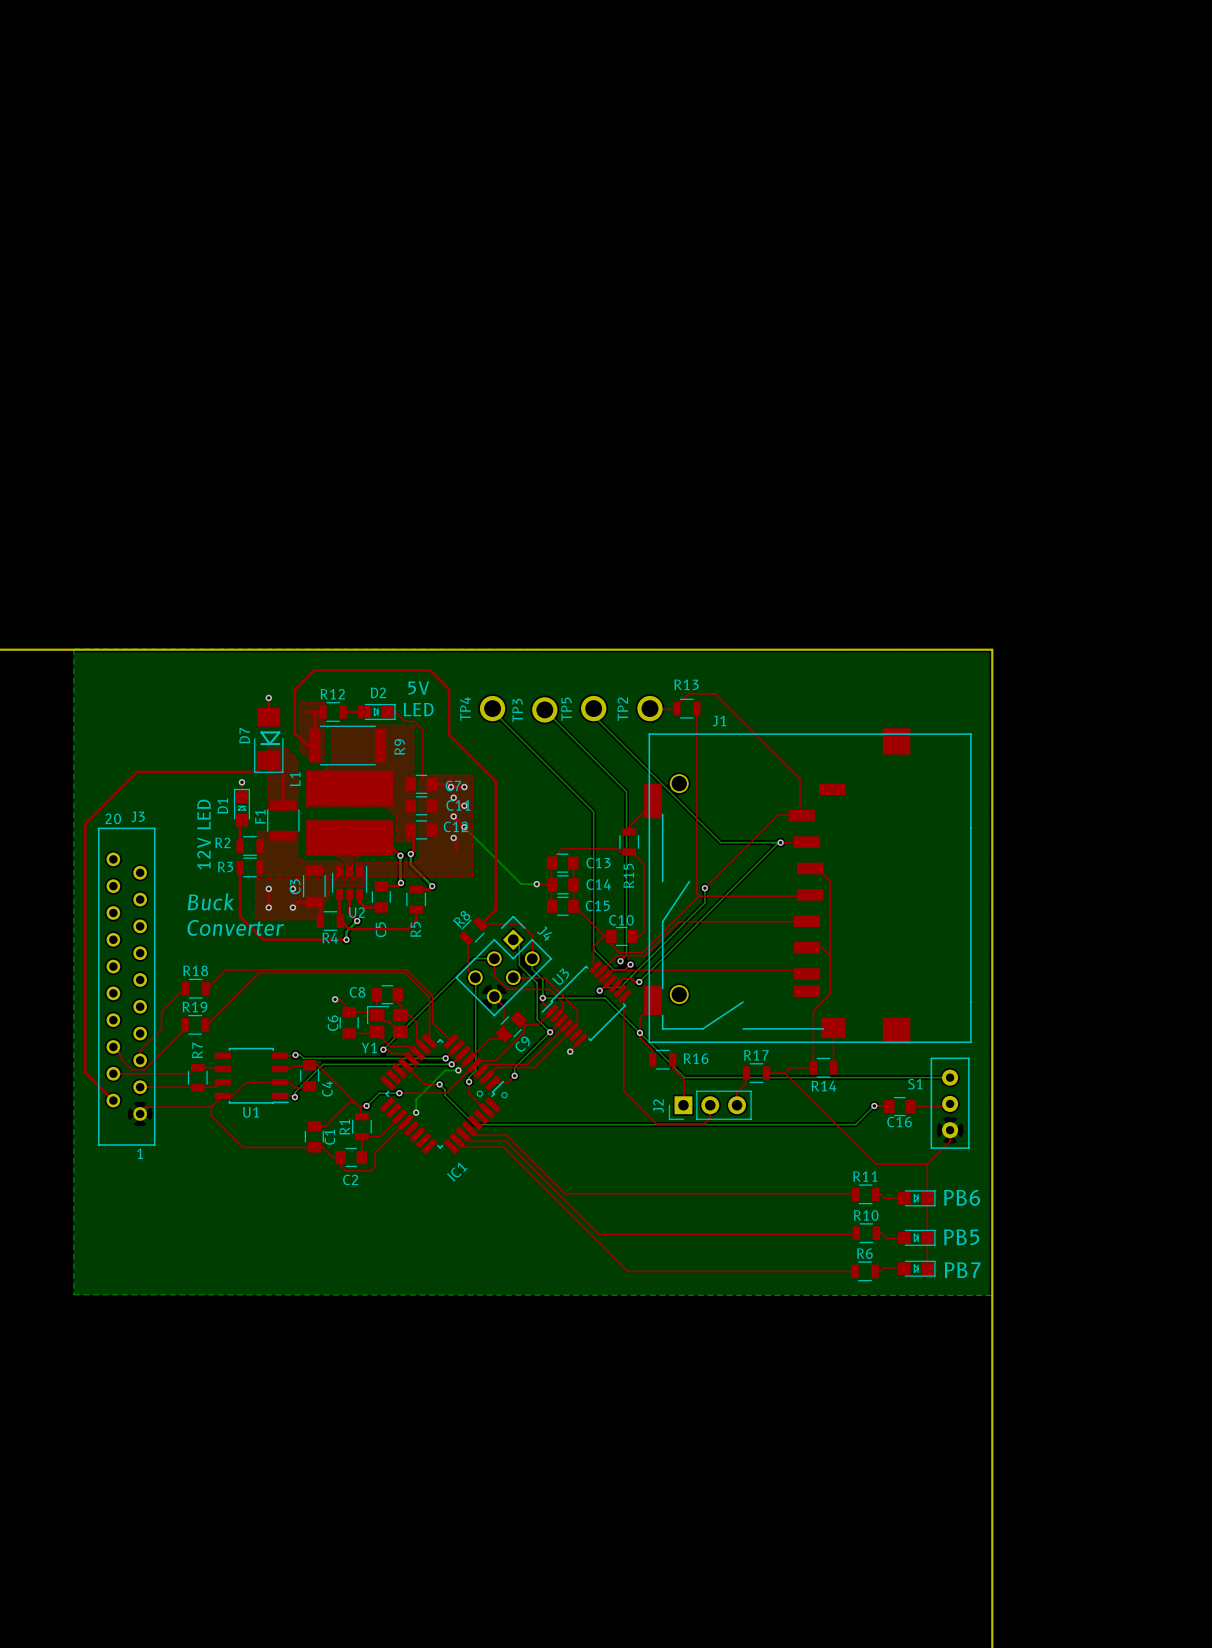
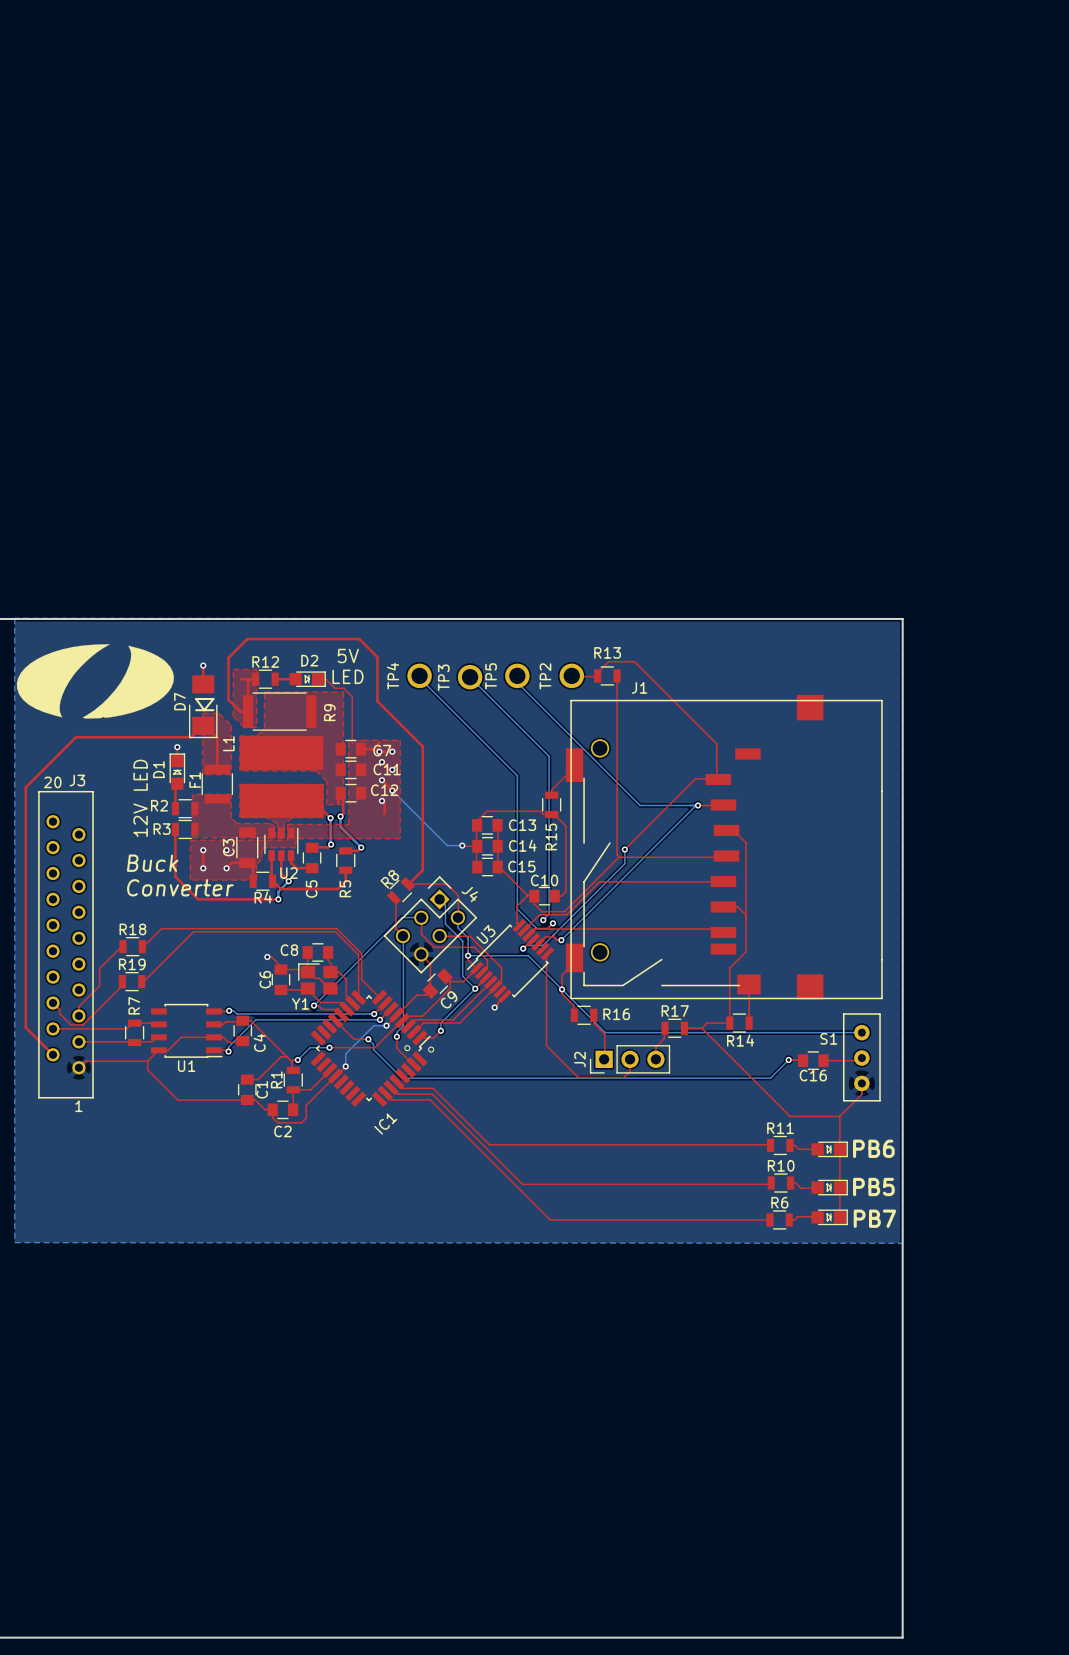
drawing: none -> [16, 644, 174, 719]

